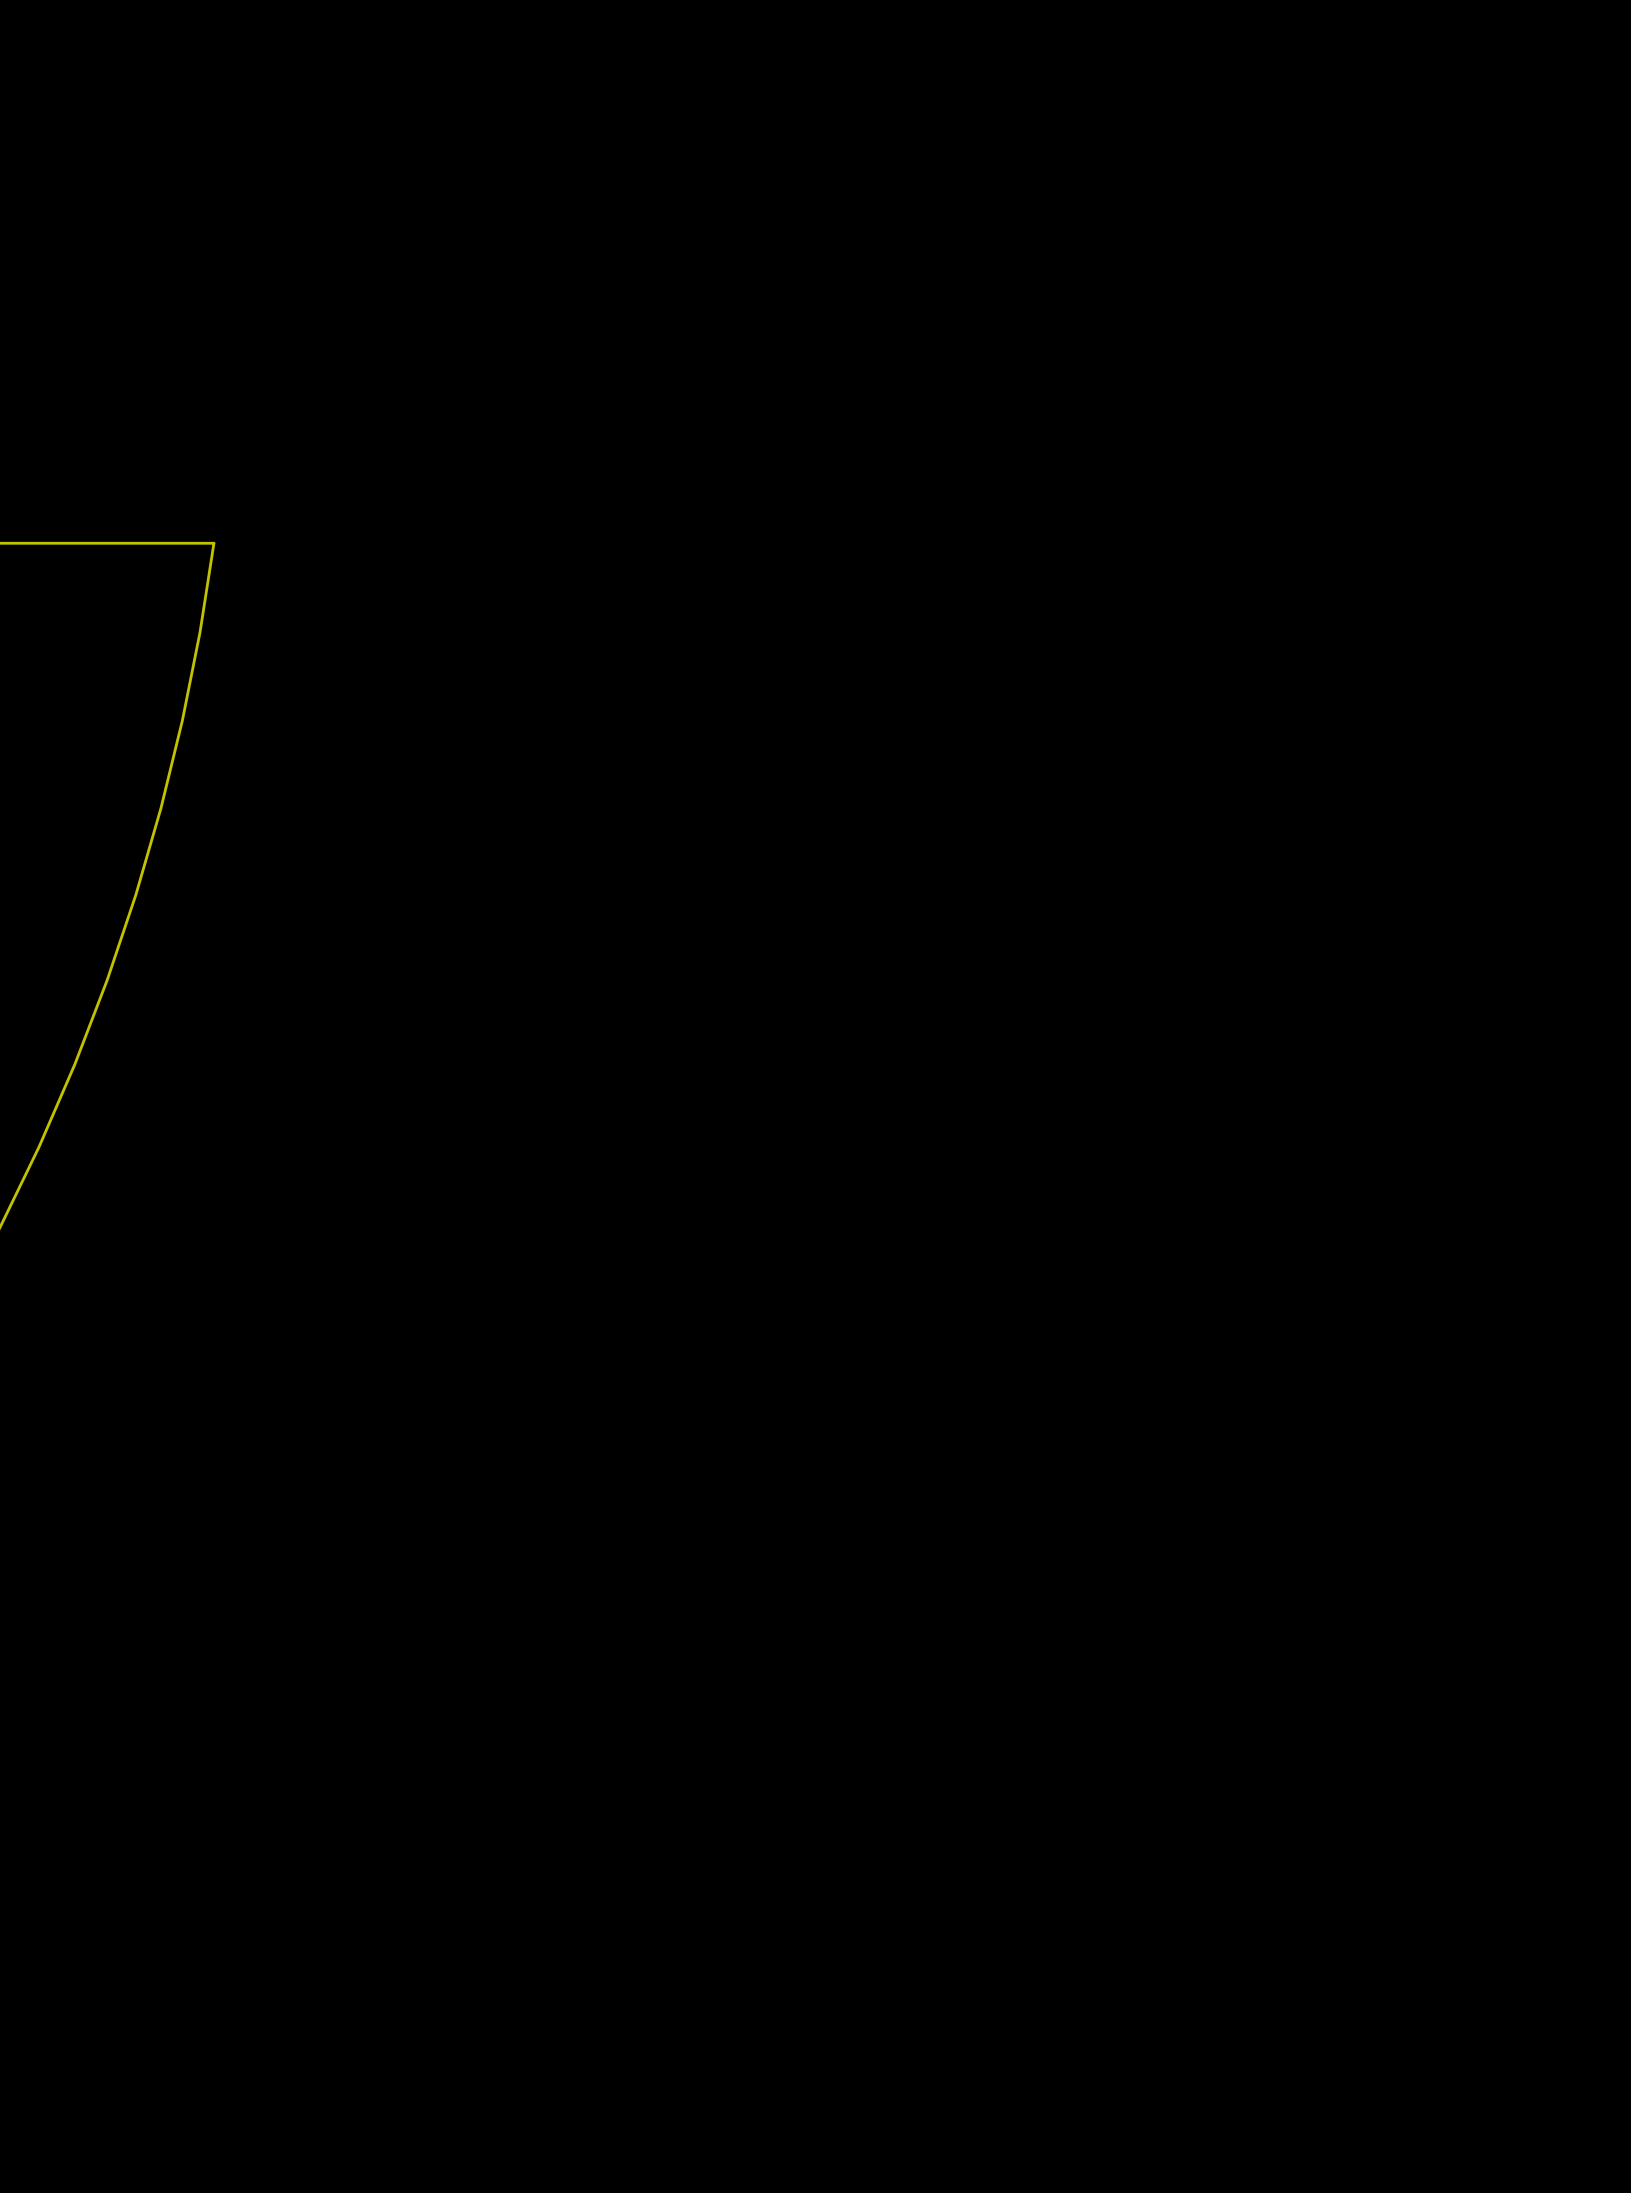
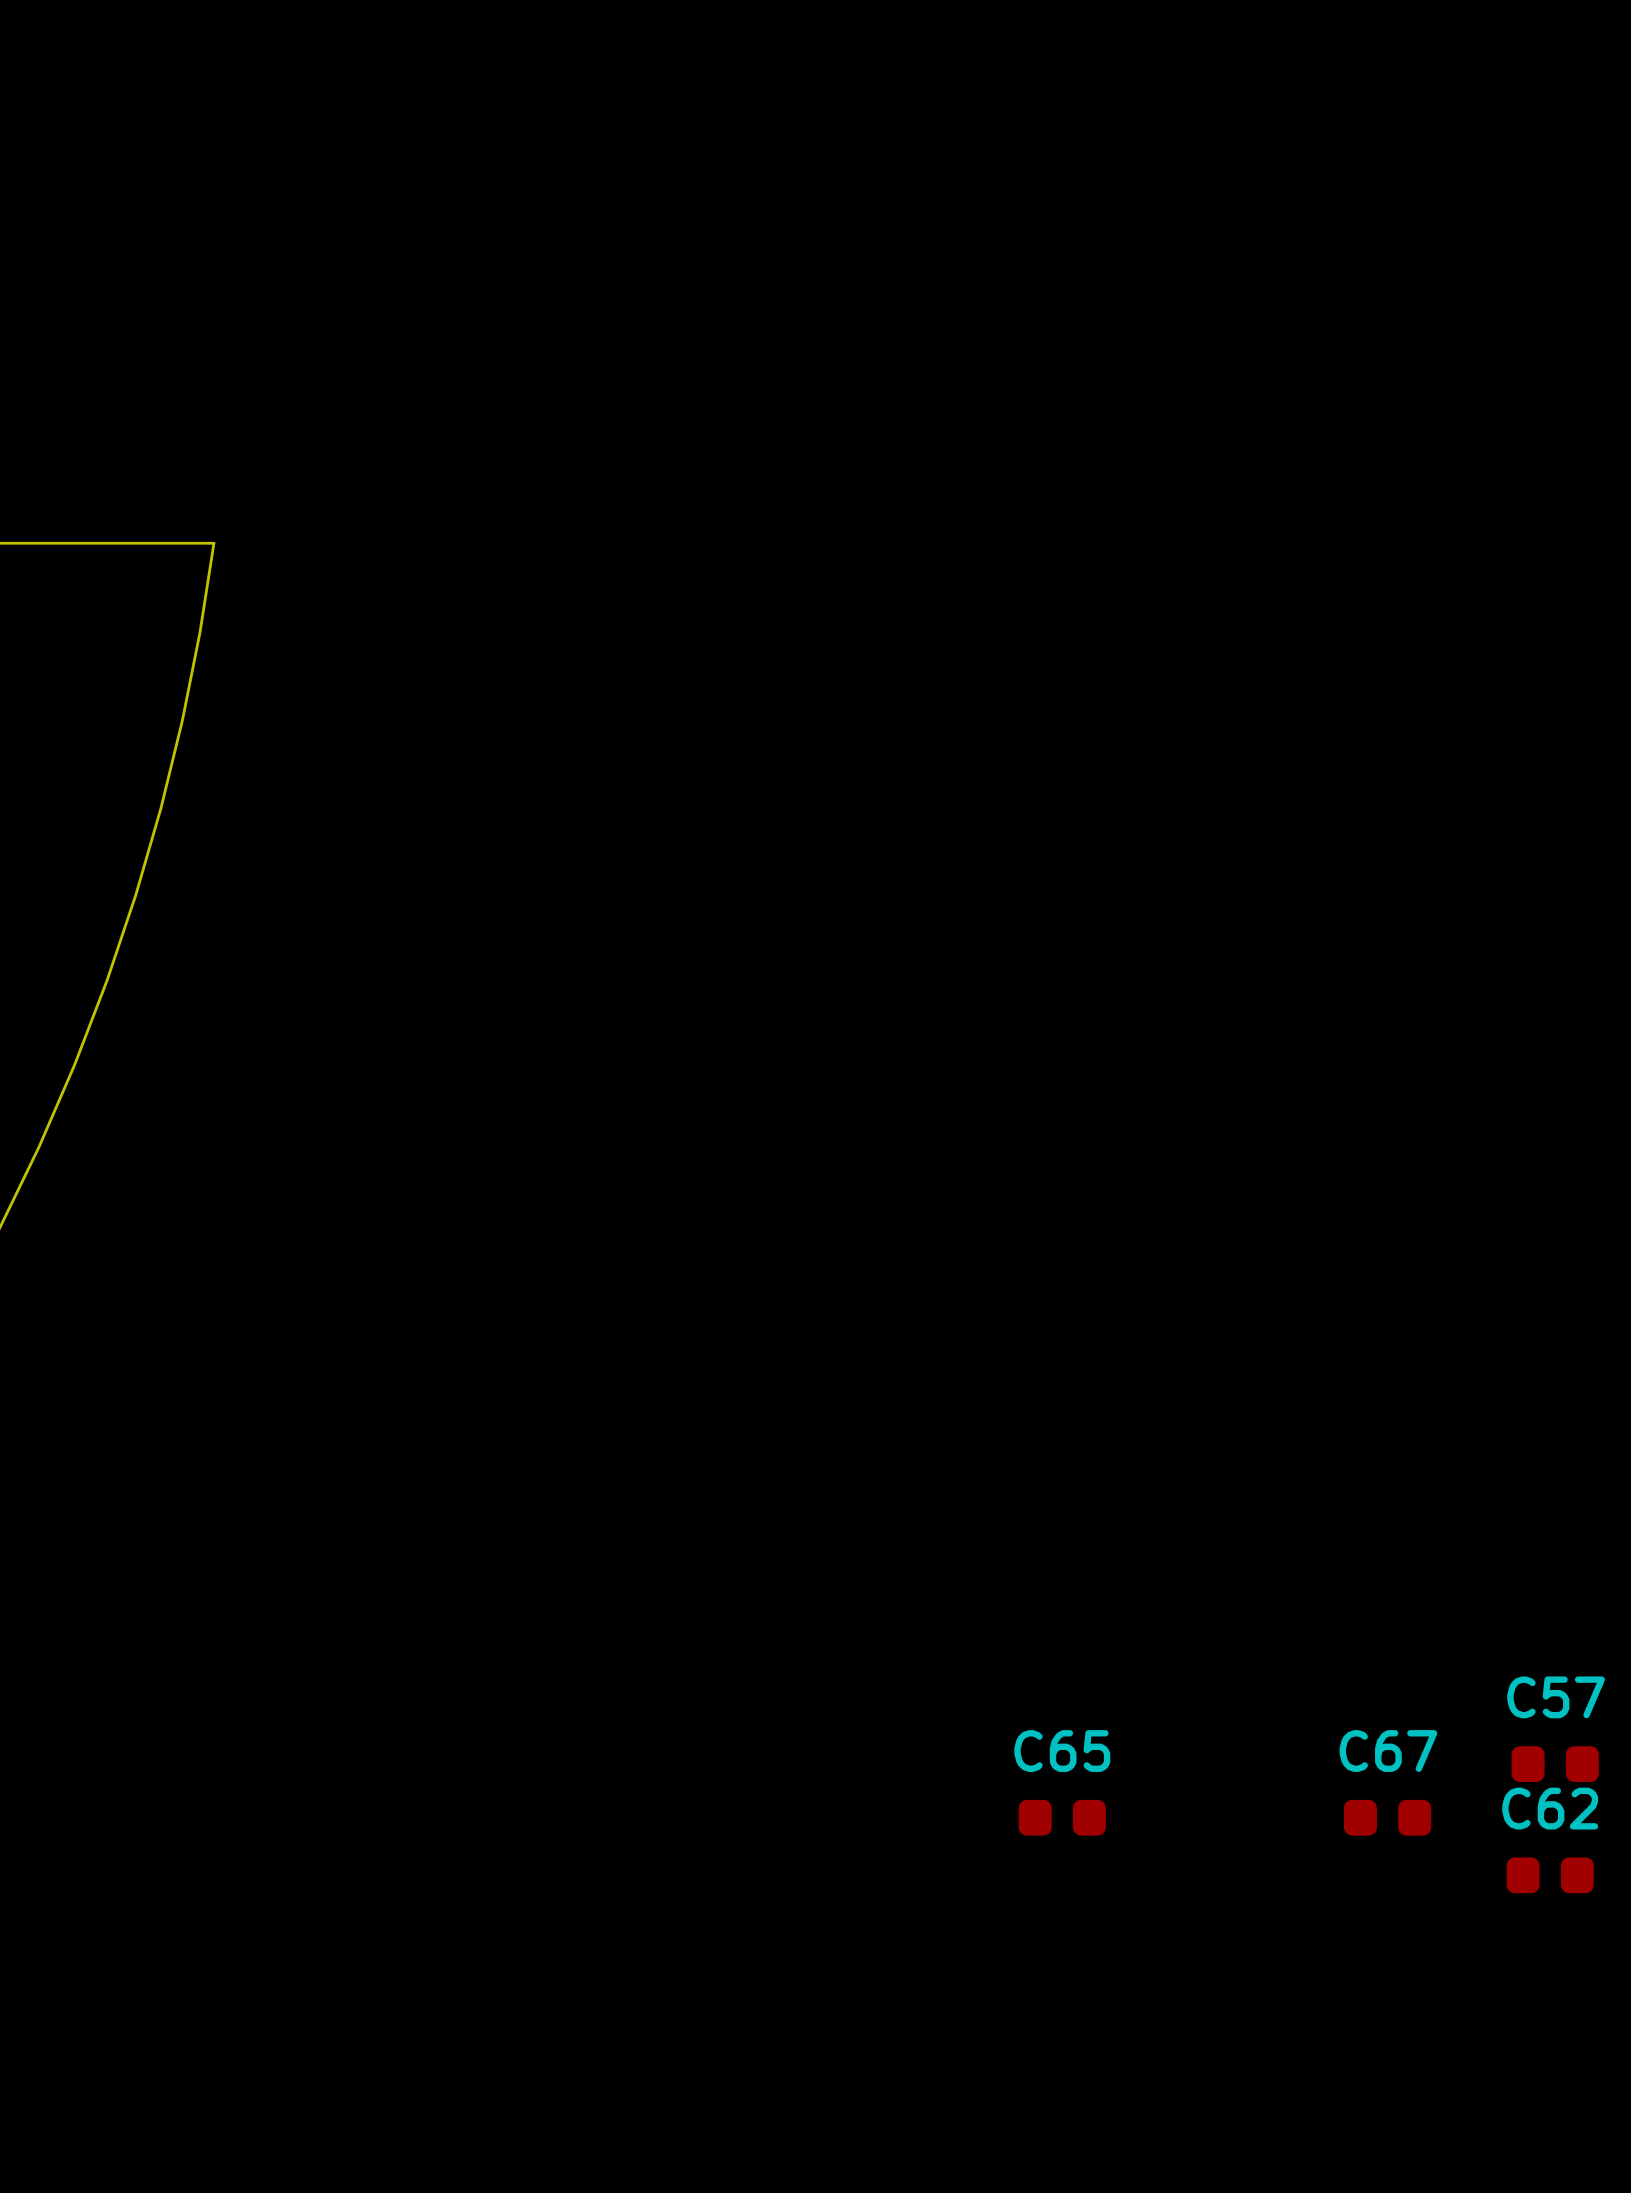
C57: none -> (1555, 1764)
C65: none -> (1062, 1817)
C67: none -> (1387, 1817)
C62: none -> (1550, 1875)

